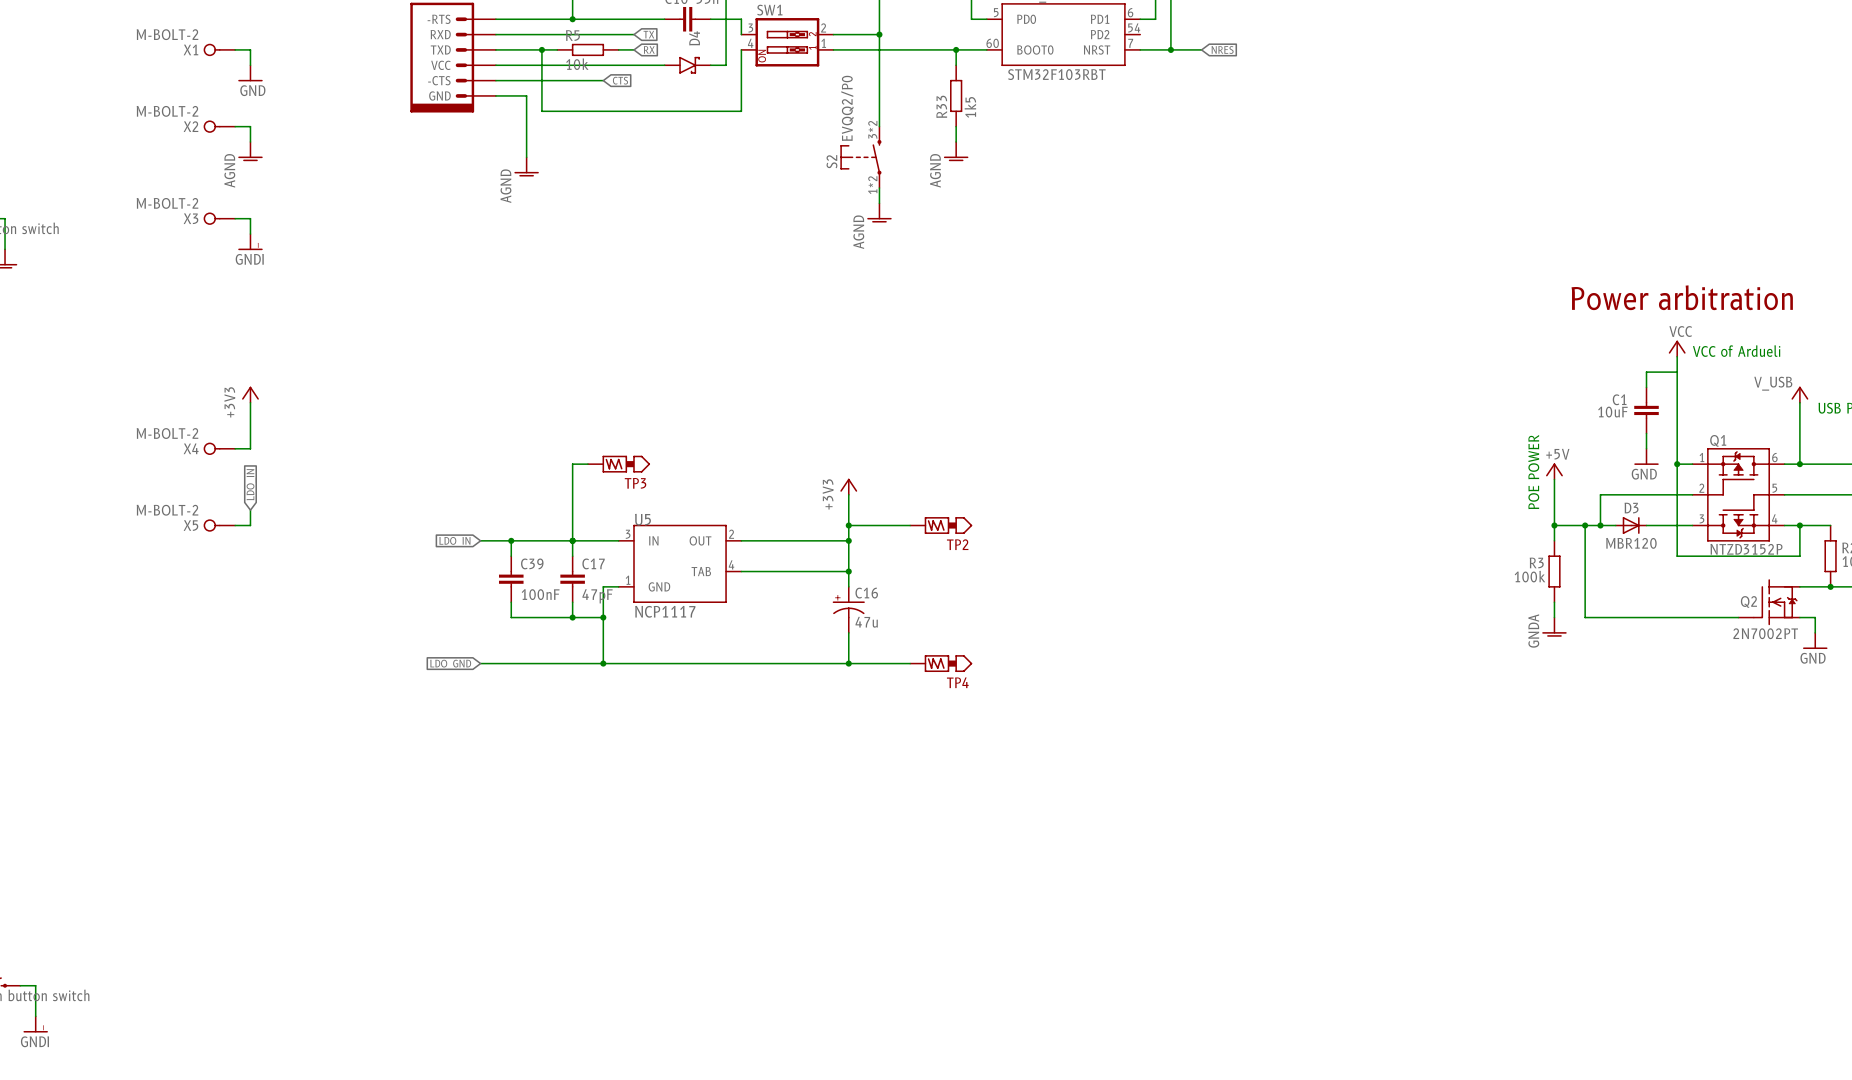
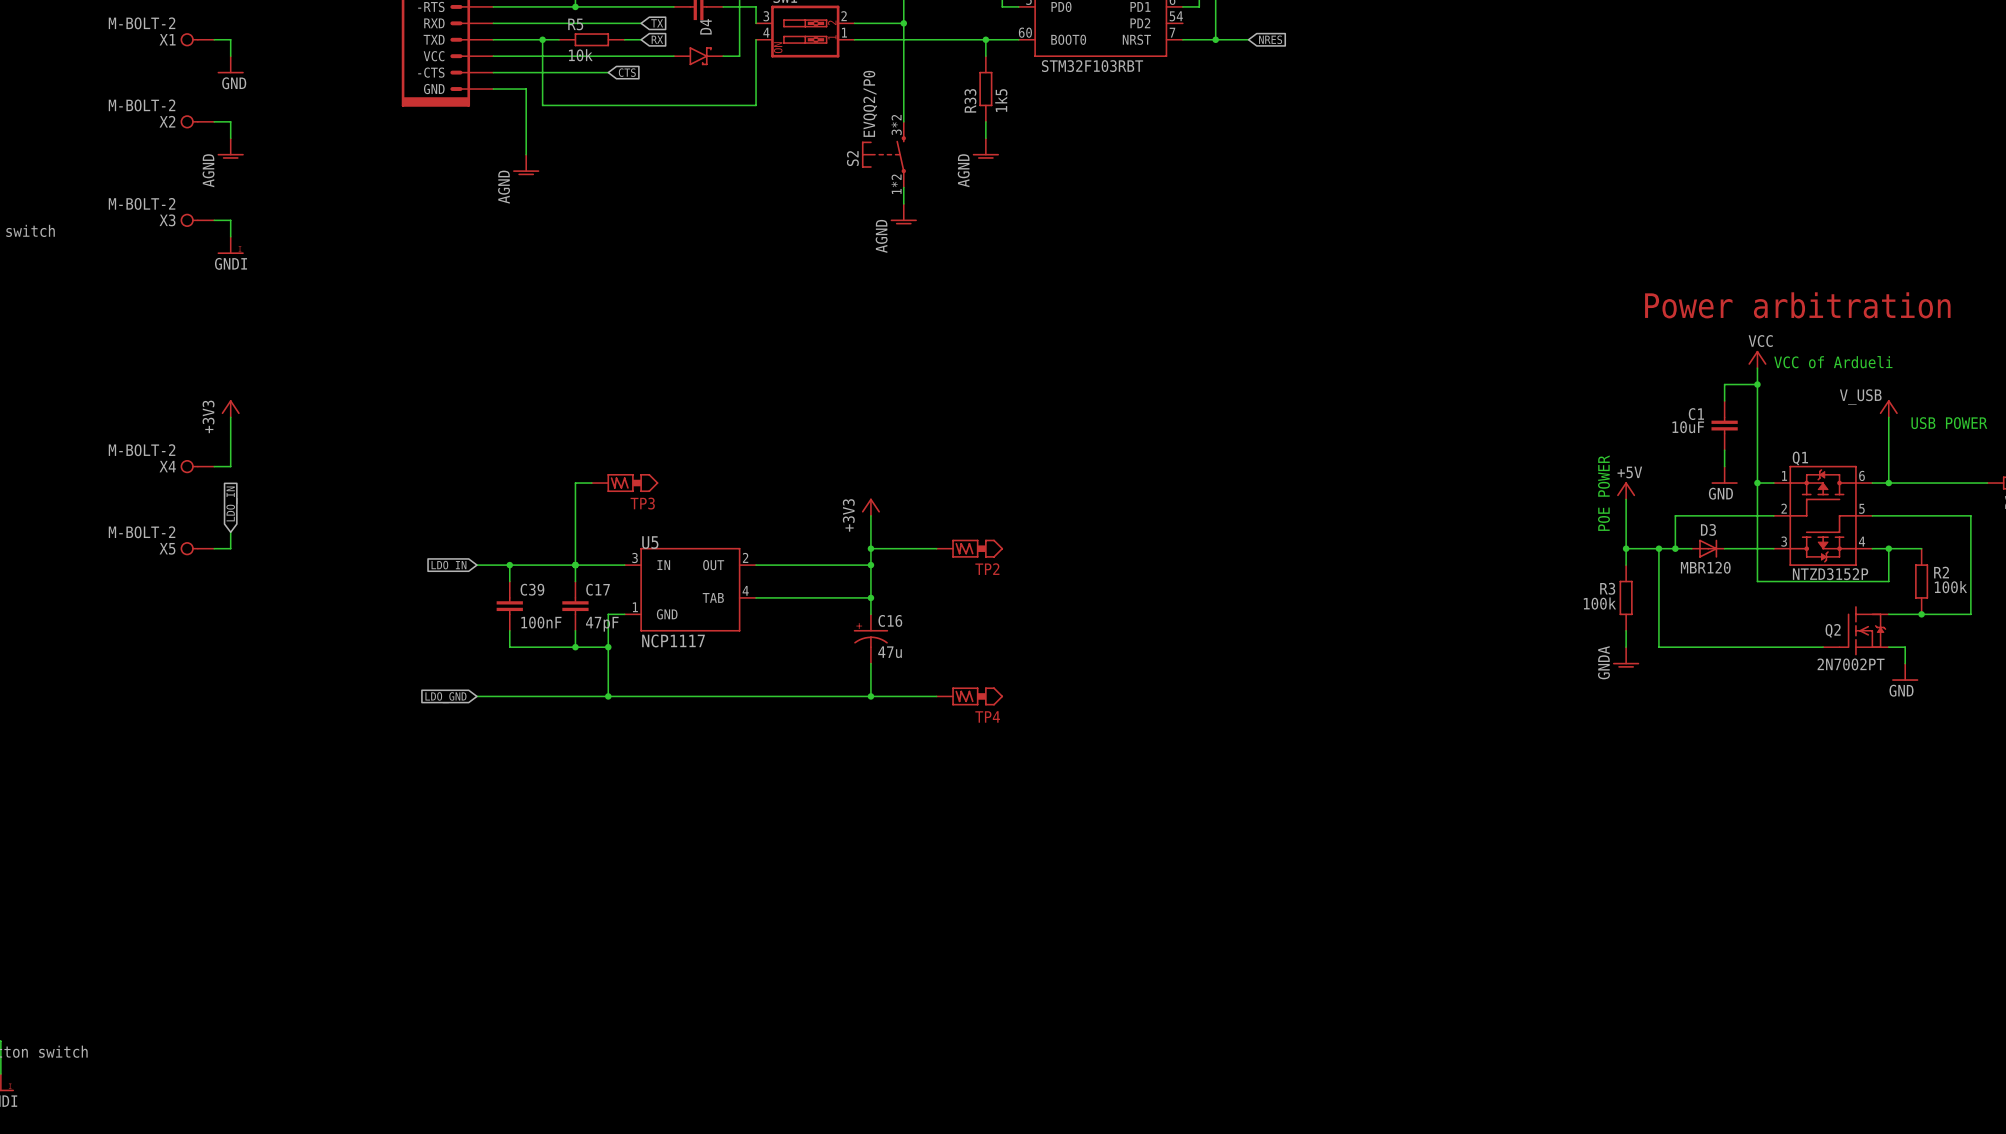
junction: none -> (1757, 384)

